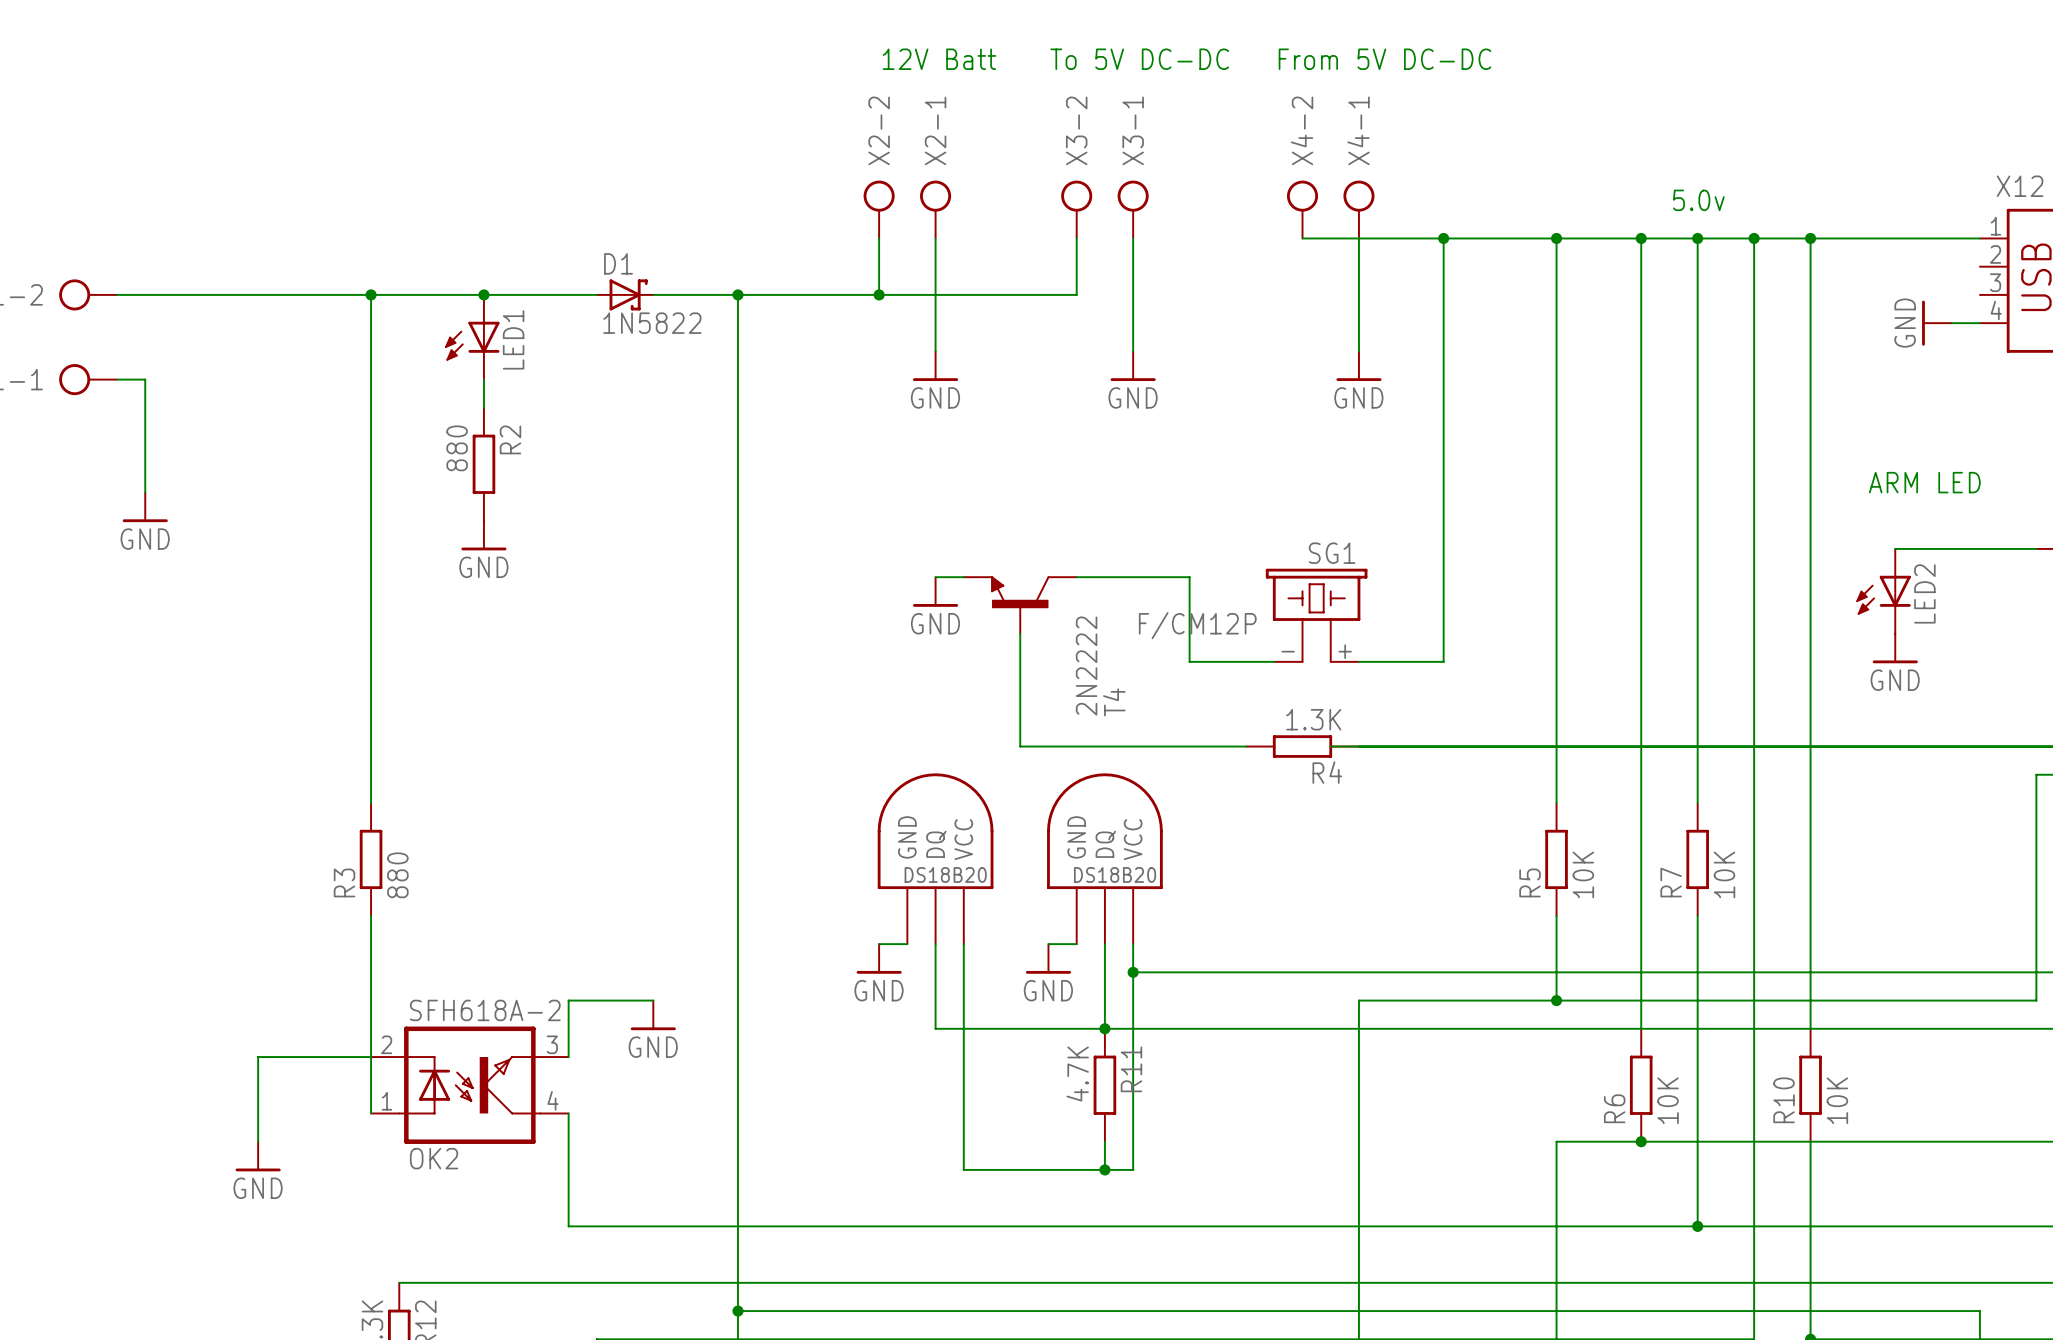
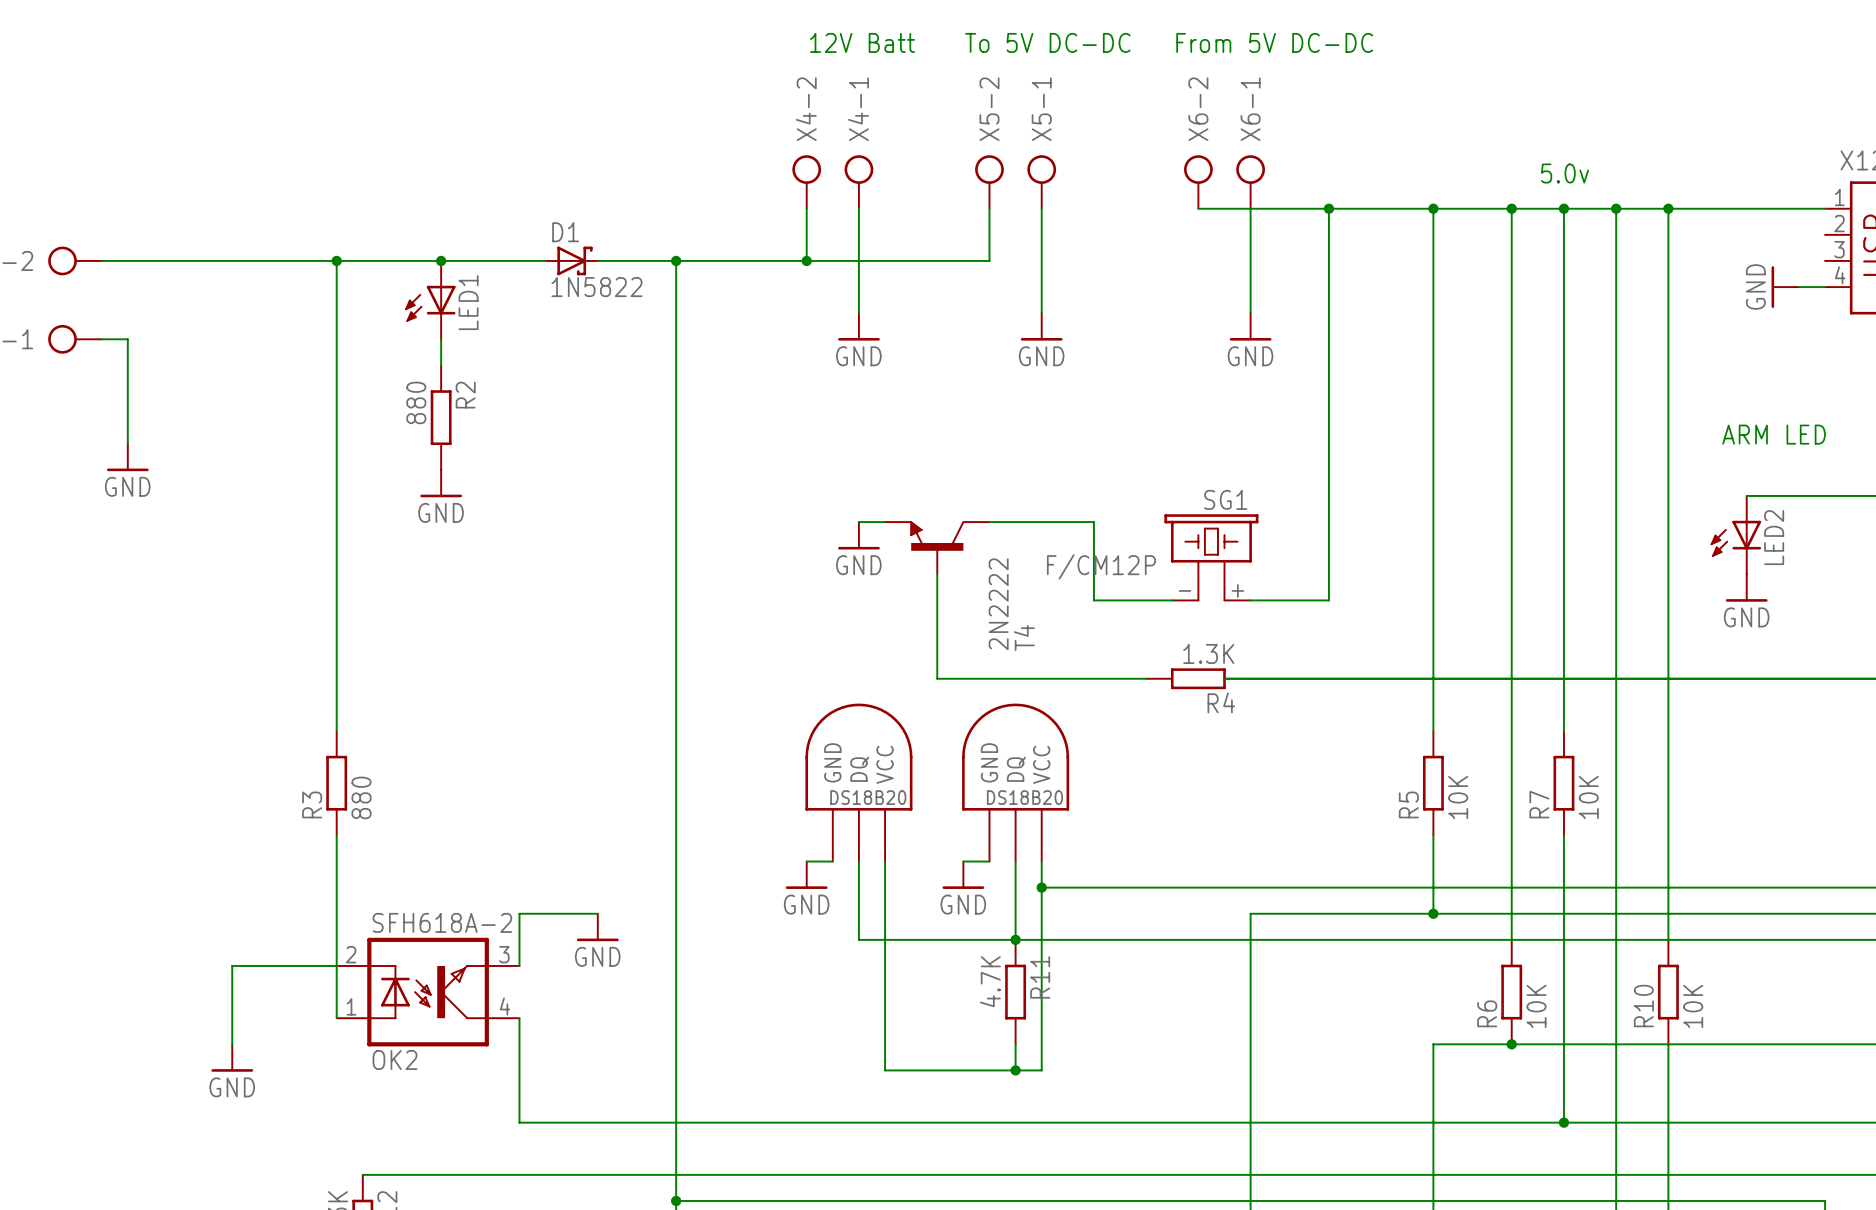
X2-2 name: X2-2 (879, 130) -> X4-2 (806, 109)
X2-1 name: X2-1 (935, 130) -> X4-1 (858, 109)
X3-2 name: X3-2 (1076, 130) -> X5-2 (989, 109)
X3-1 name: X3-1 (1133, 130) -> X5-1 (1041, 109)
X4-2 name: X4-2 (1302, 130) -> X6-2 (1198, 109)
X4-1 name: X4-1 (1358, 130) -> X6-1 (1250, 109)

